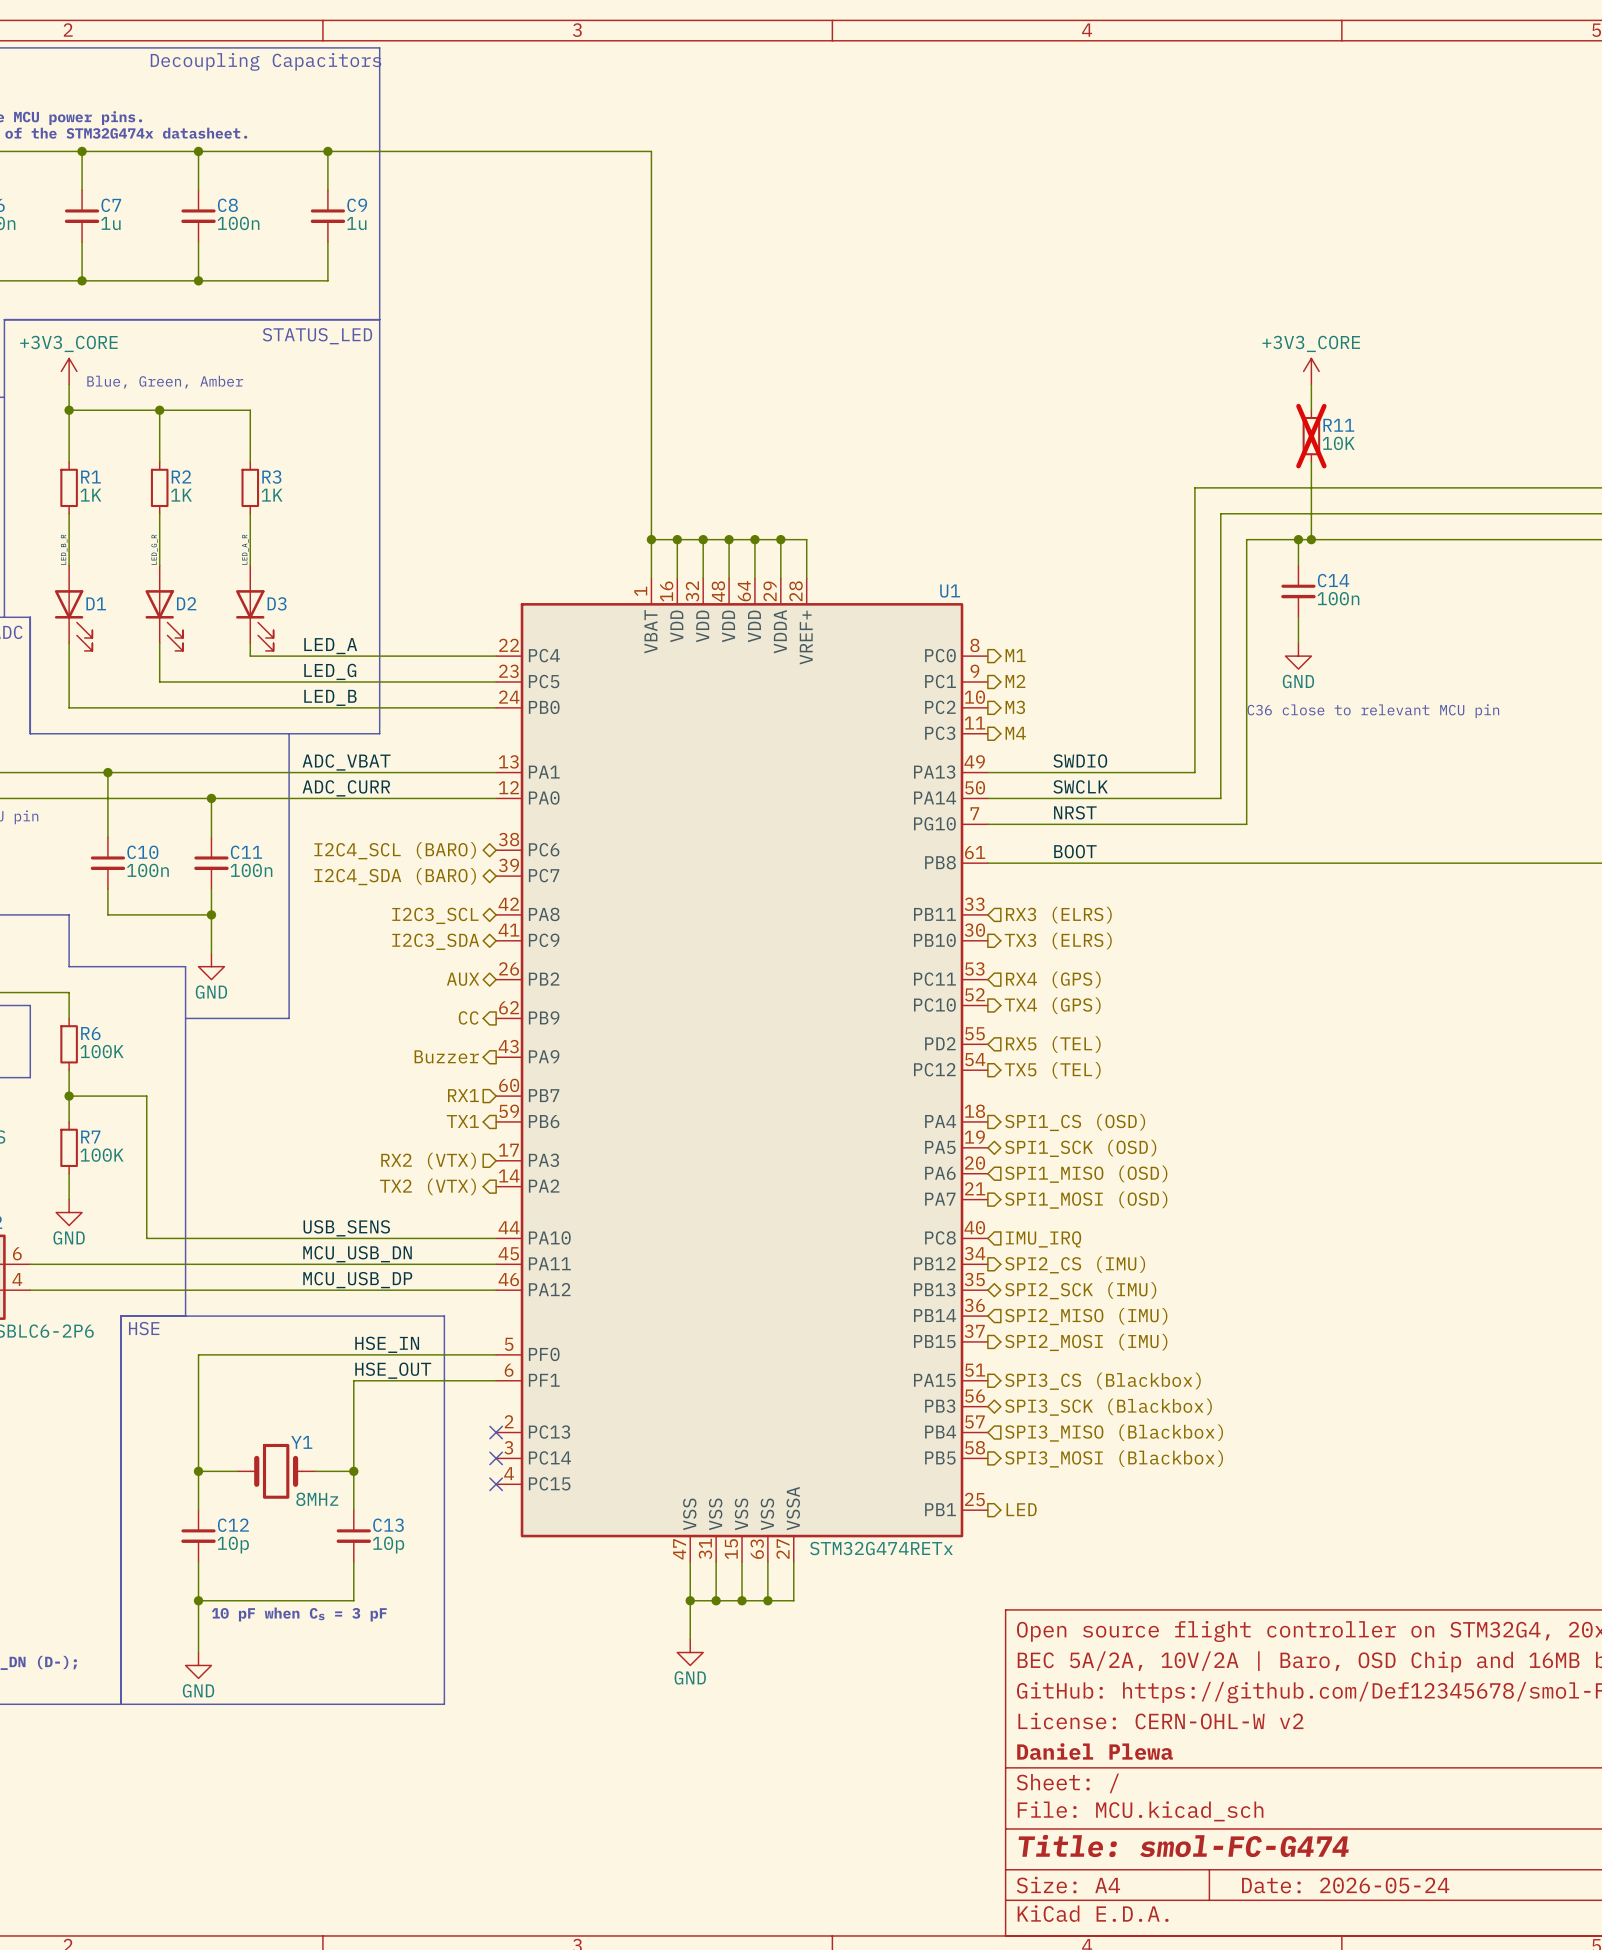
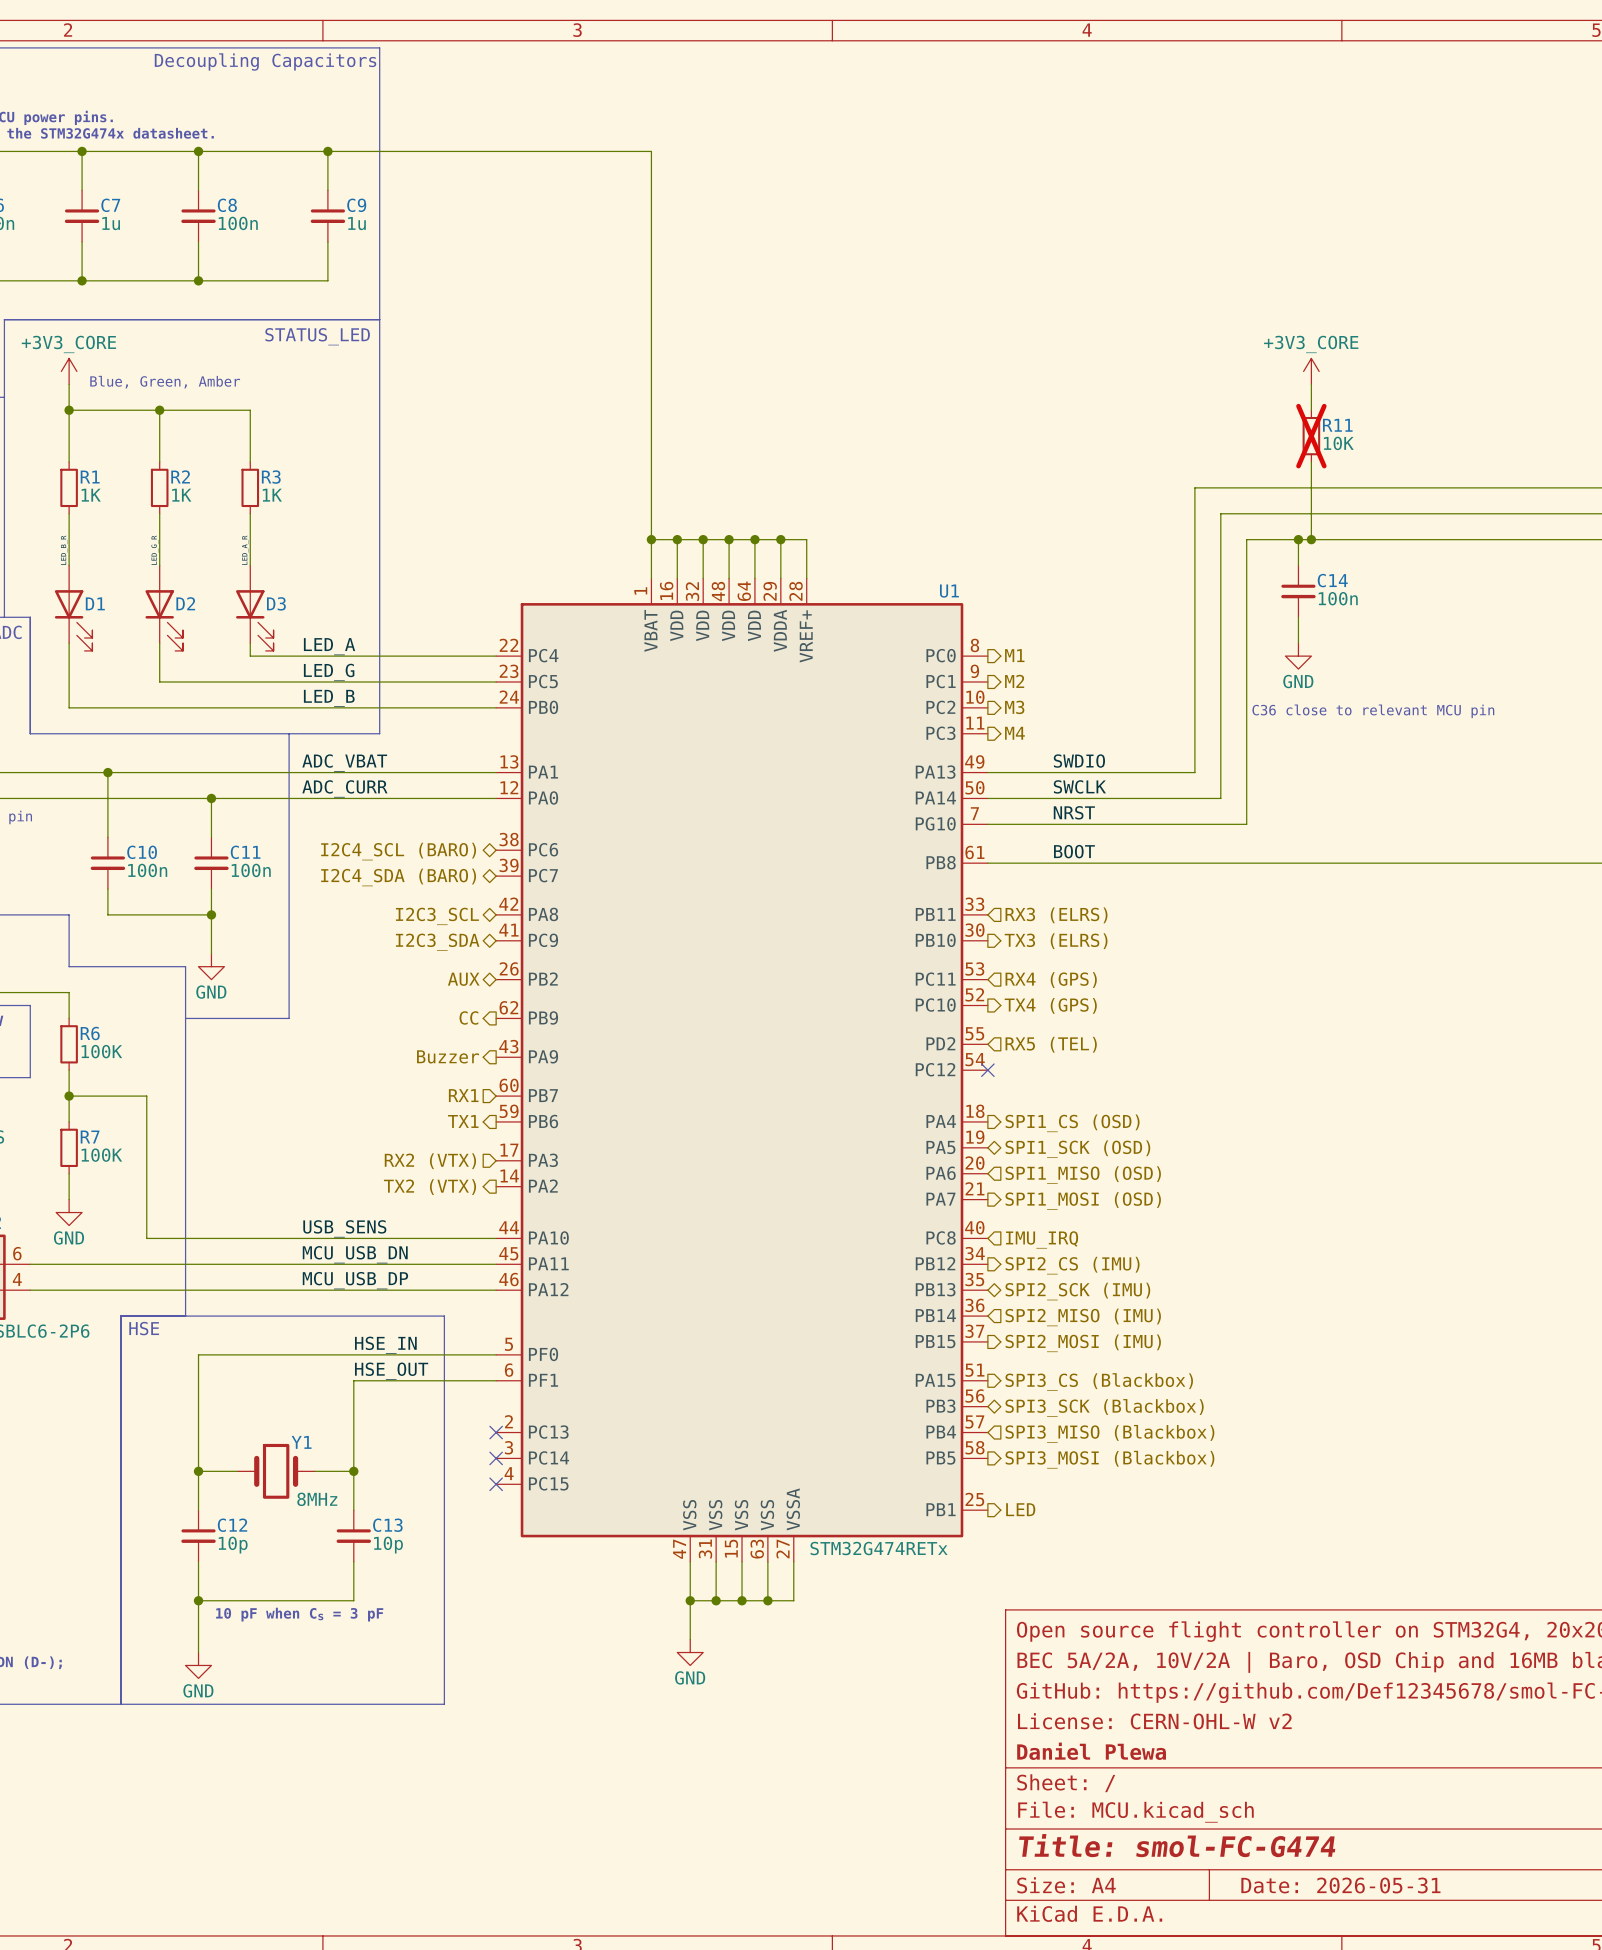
no-connect mark: none -> (987, 1070)
hierarchical label: TX5 (TEL) (1052, 1070) -> none
title block: Date: 2026-05-24 (1345, 1885) -> Date: 2026-05-31 (1340, 1885)

